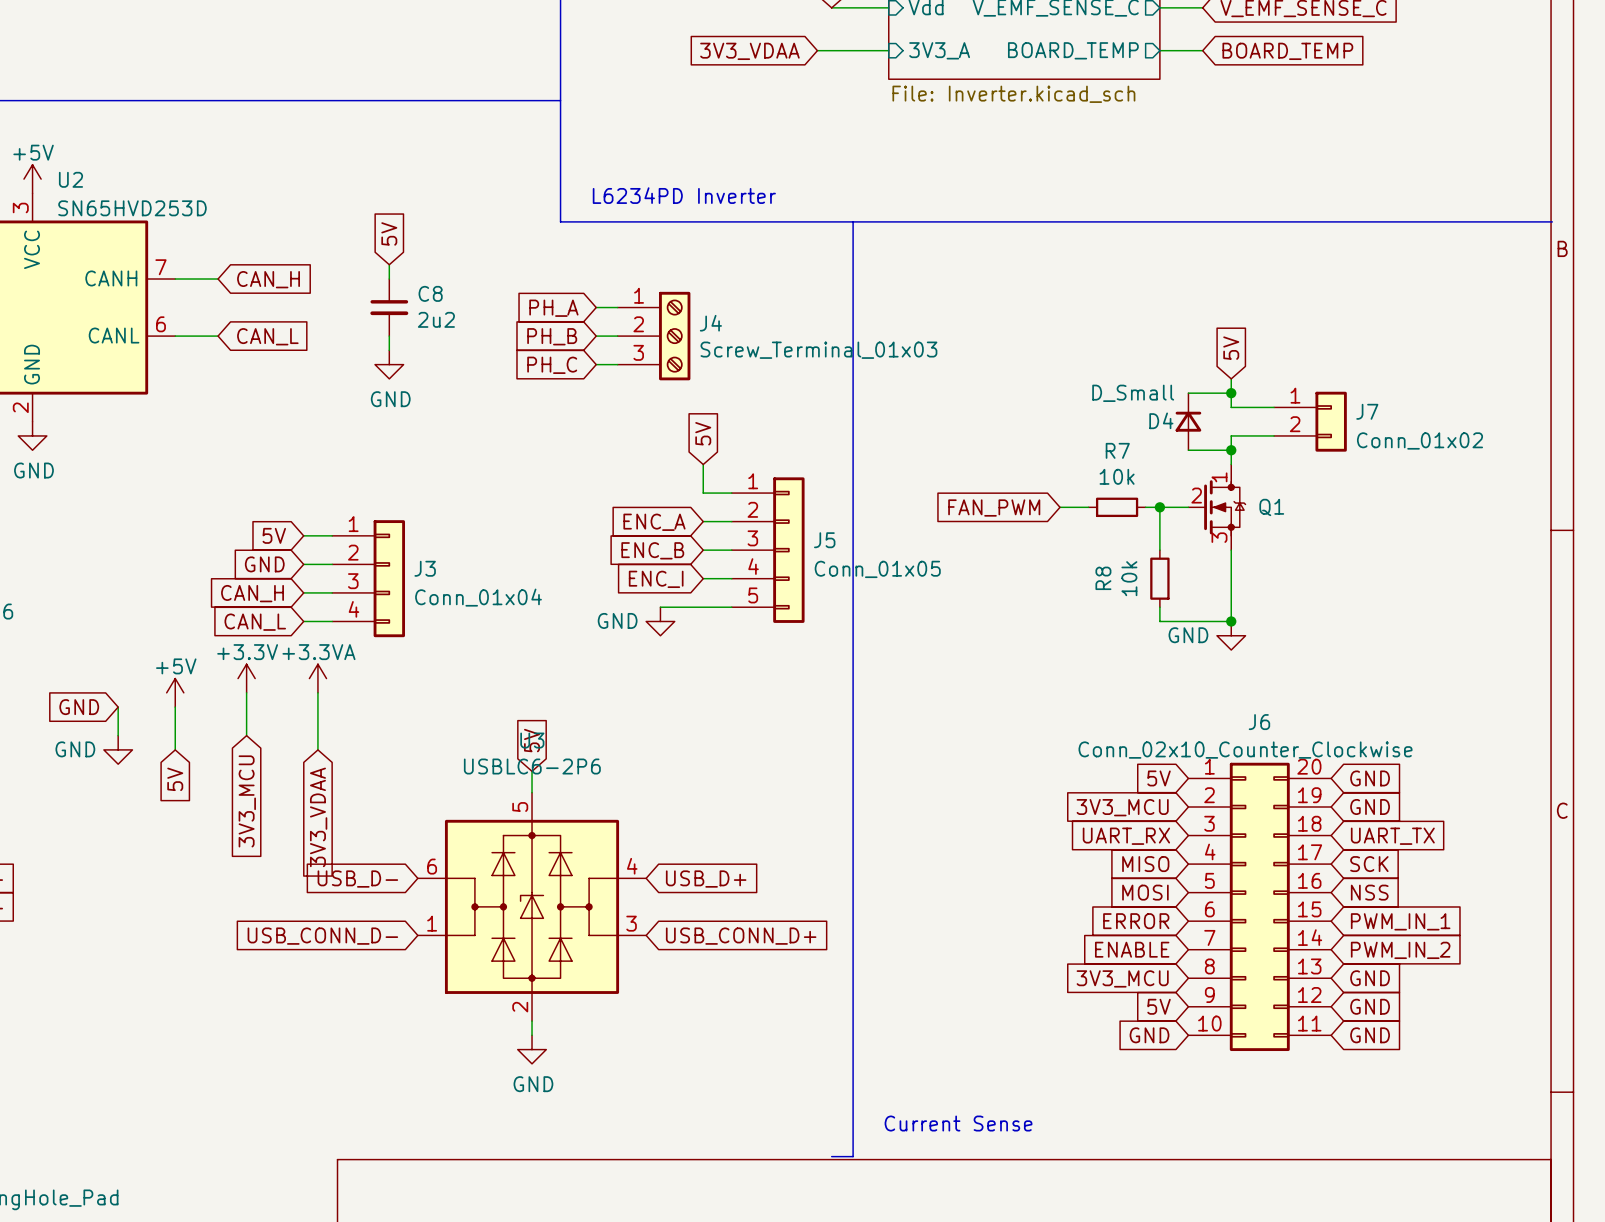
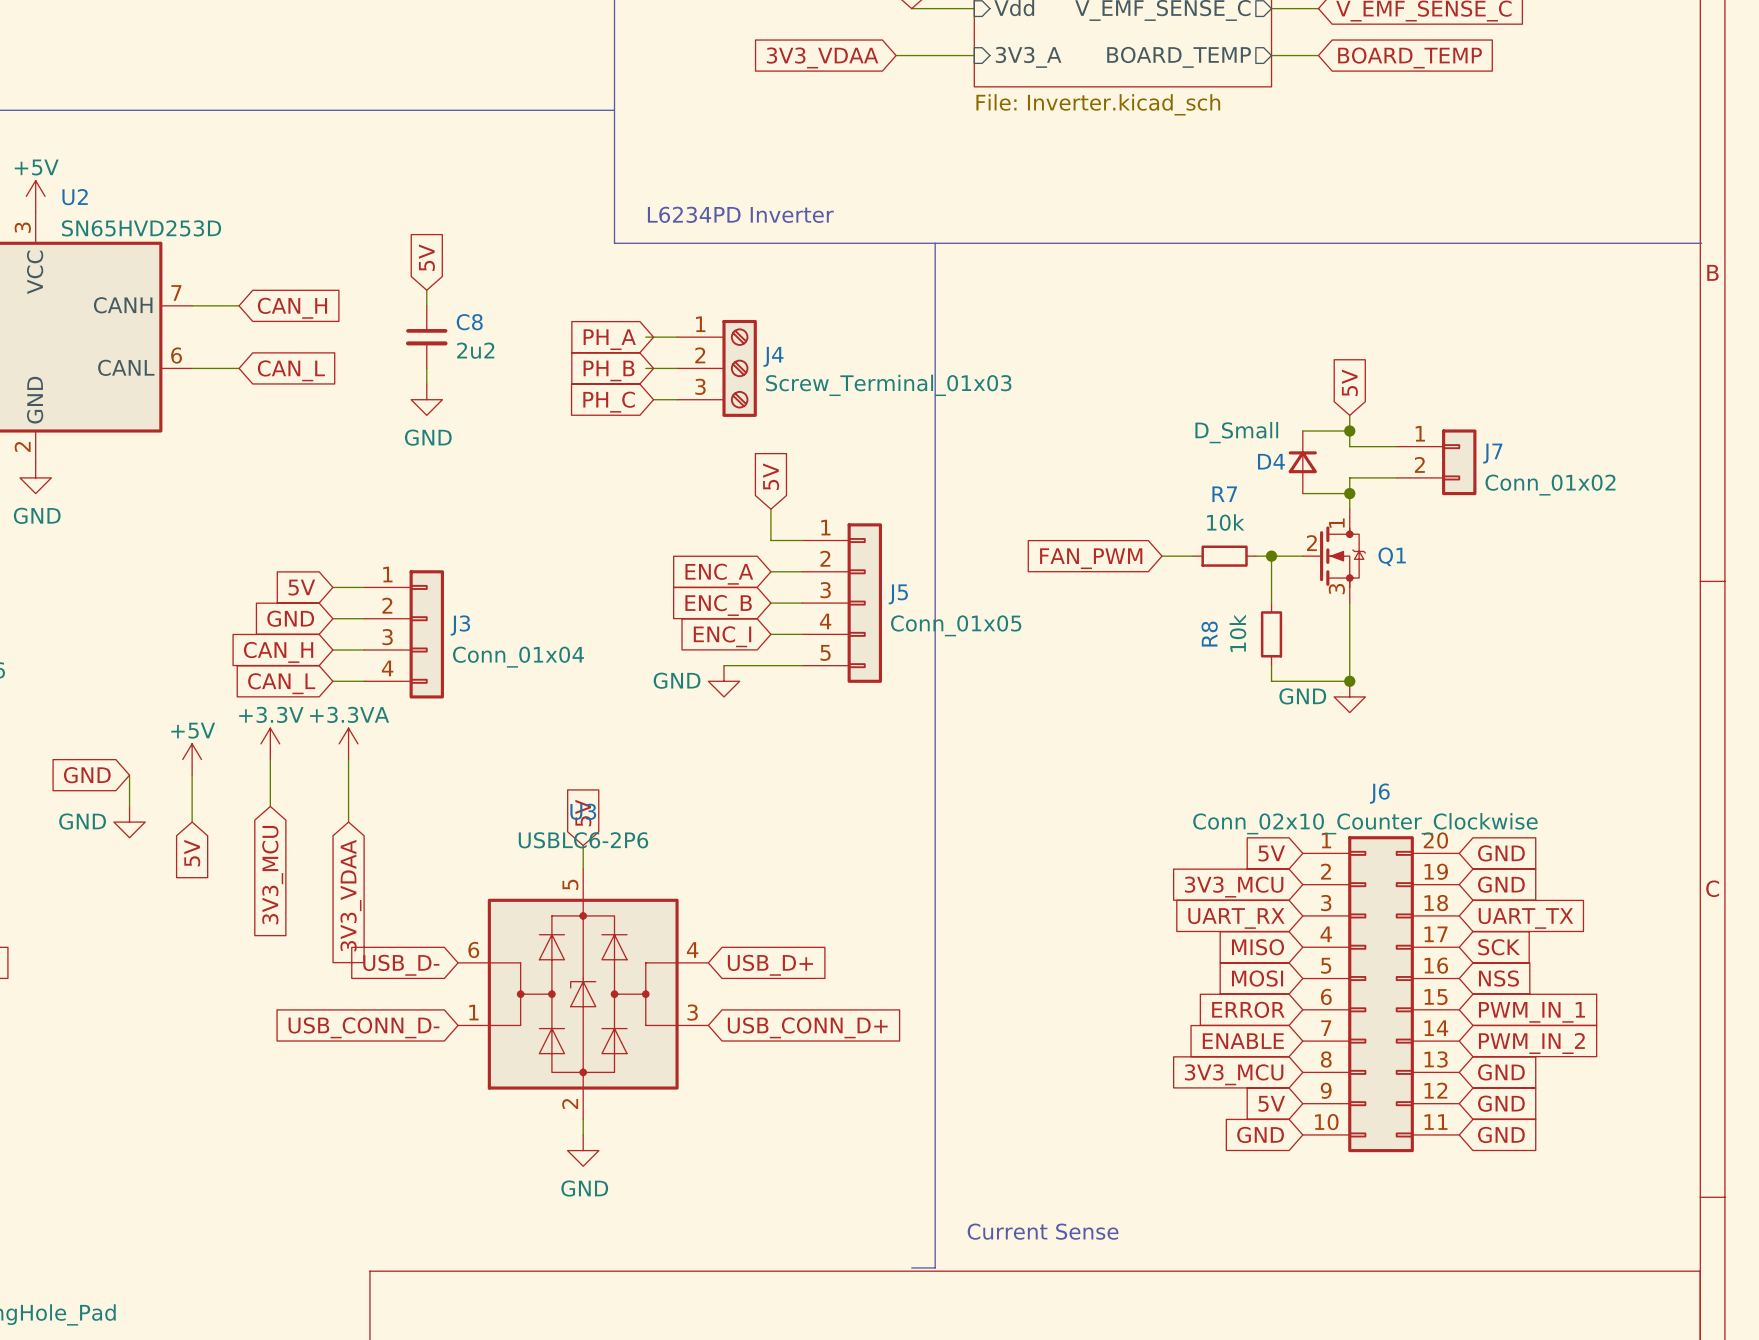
wire: none -> (645, 337) (653, 337)
wire: none -> (645, 368) (653, 368)

